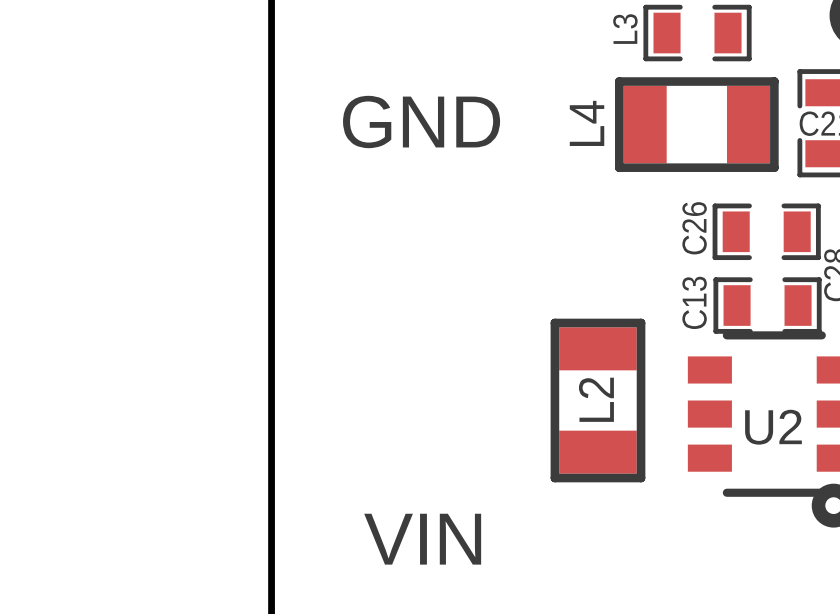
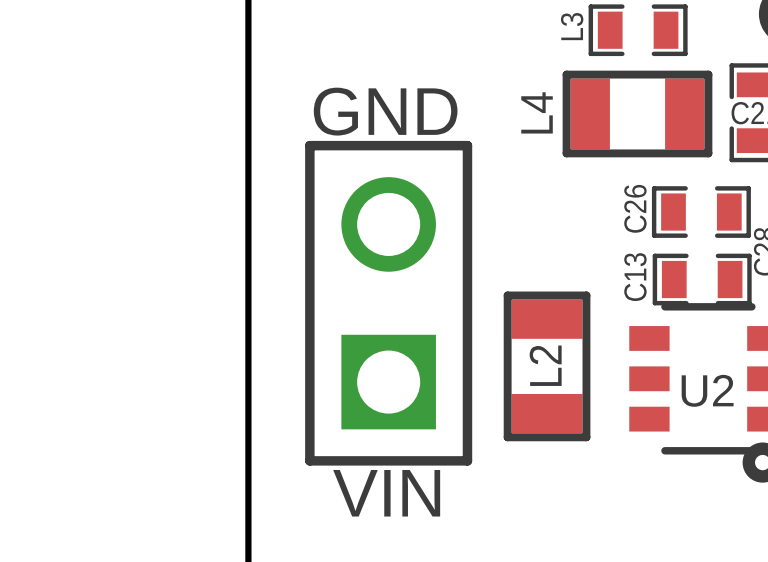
part: none -> (388, 303)

